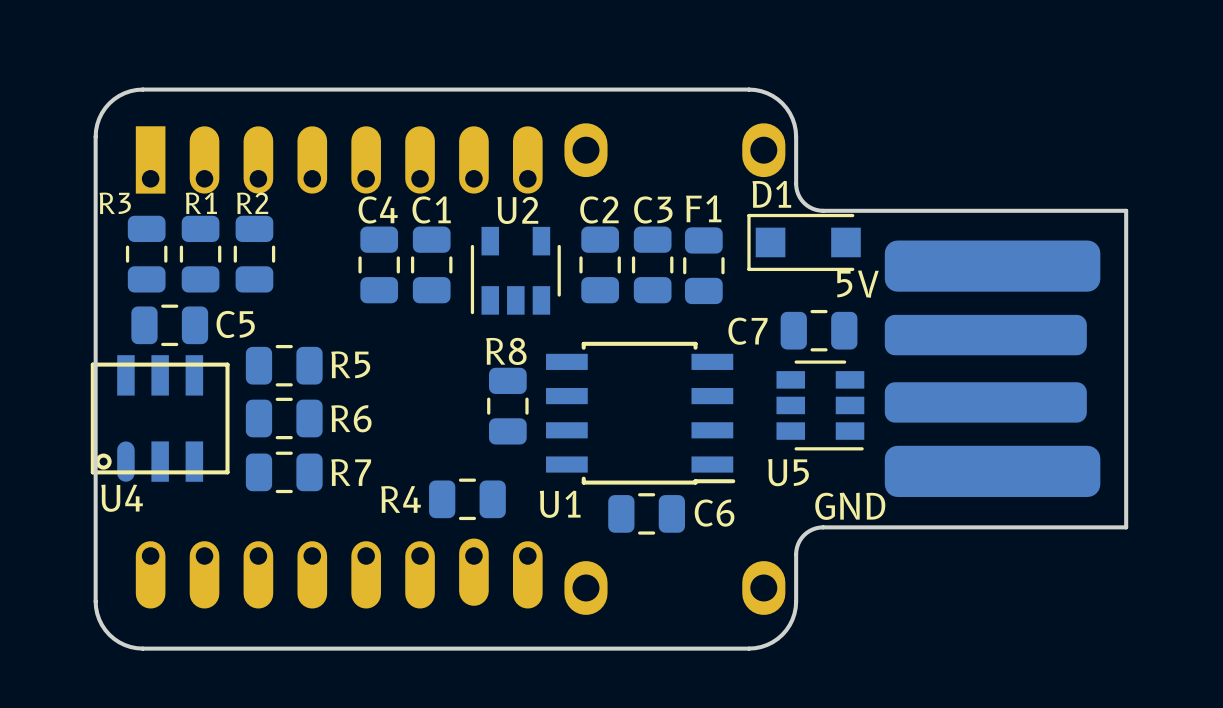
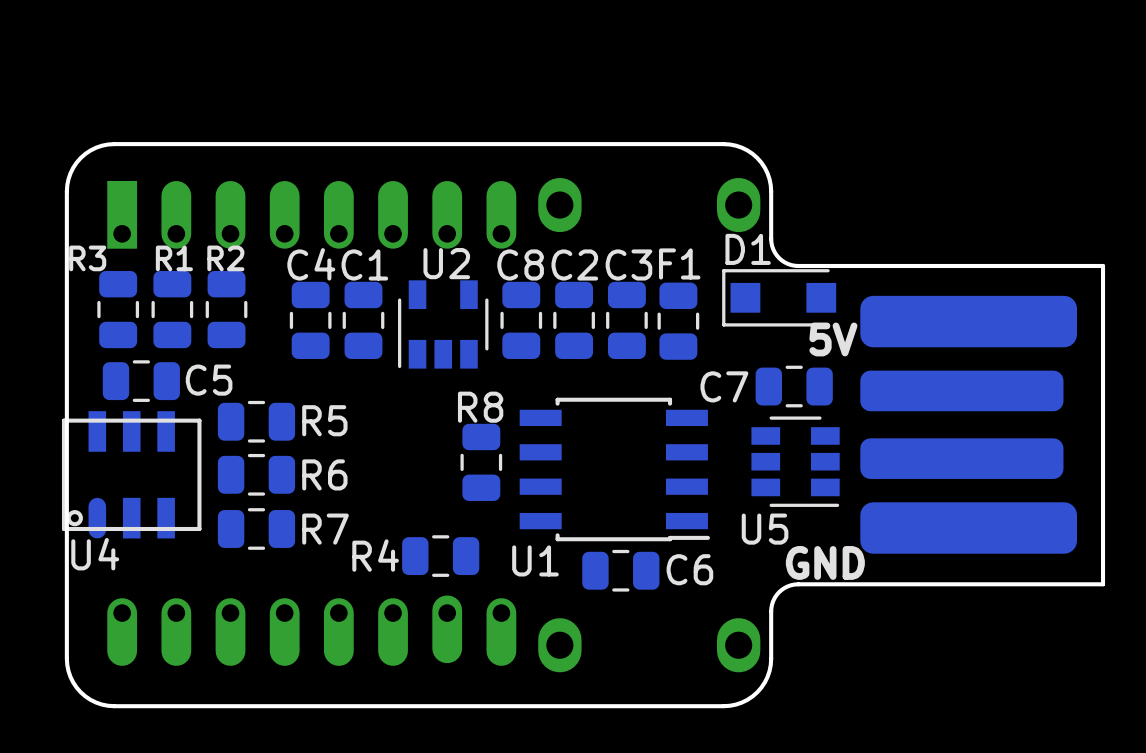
C4 position: (379, 264) -> (310, 320)
C1 position: (431, 264) -> (363, 320)
C8: none -> (521, 320)
U2 position: (515, 270) -> (443, 324)

